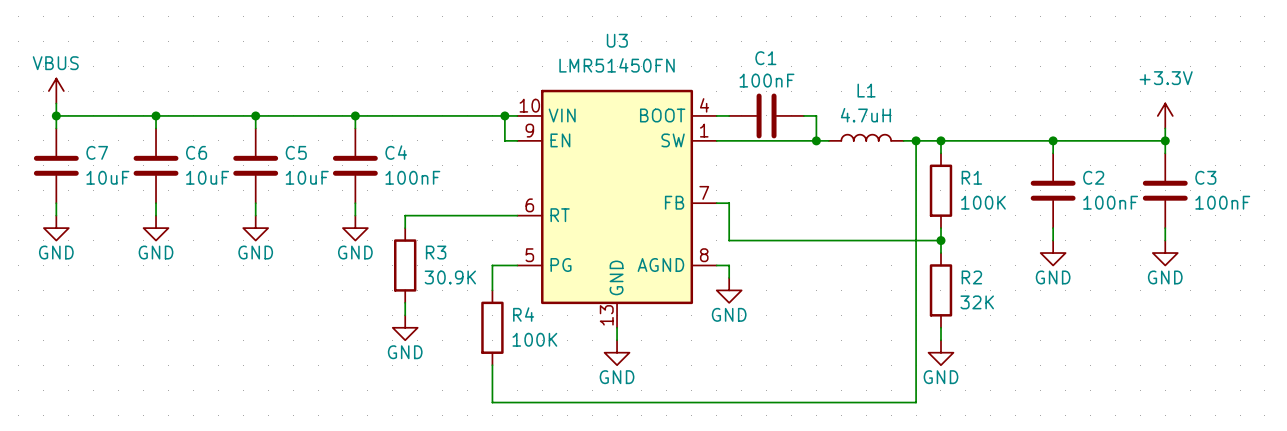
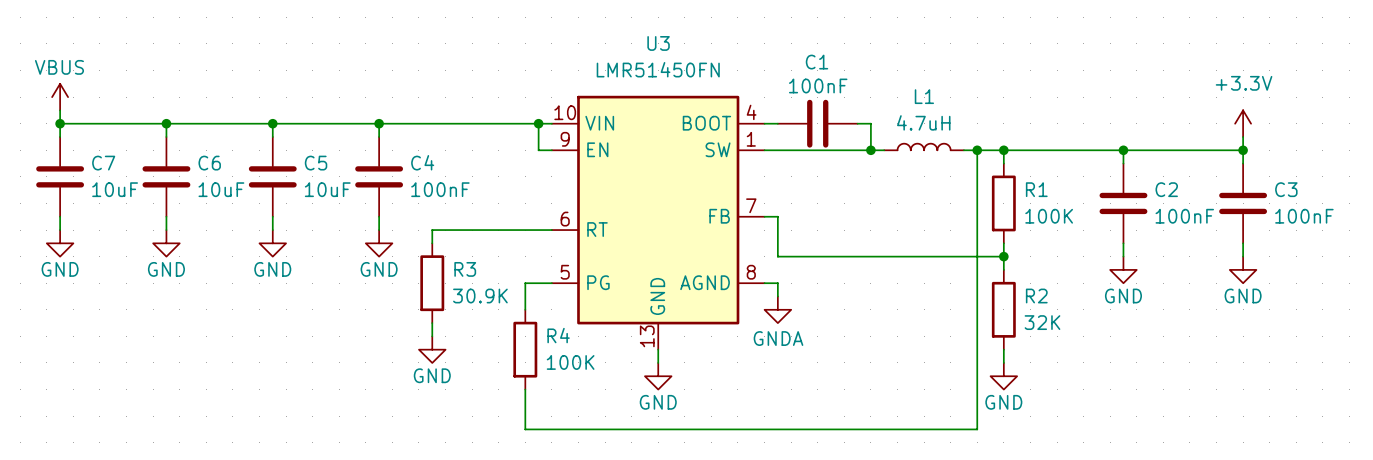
power symbol: GND (729, 290) -> GNDA (777, 309)

